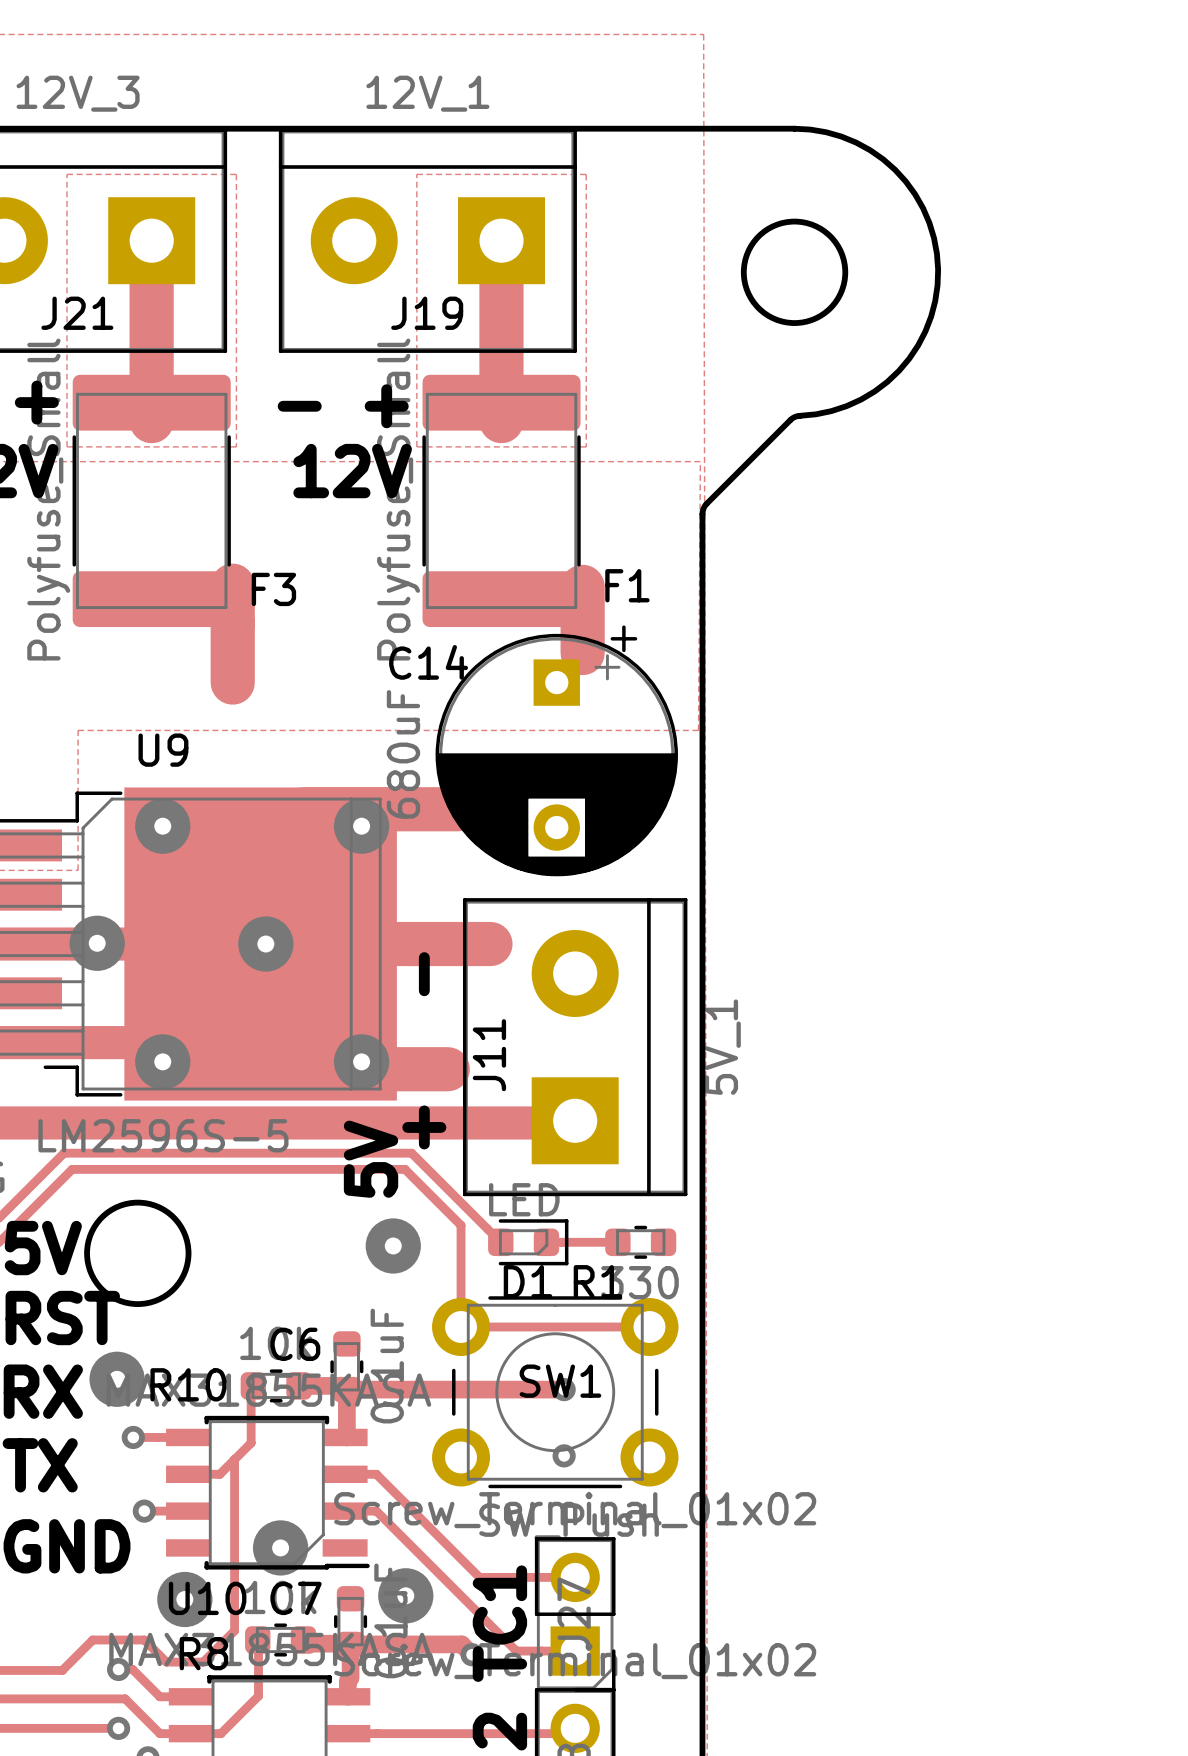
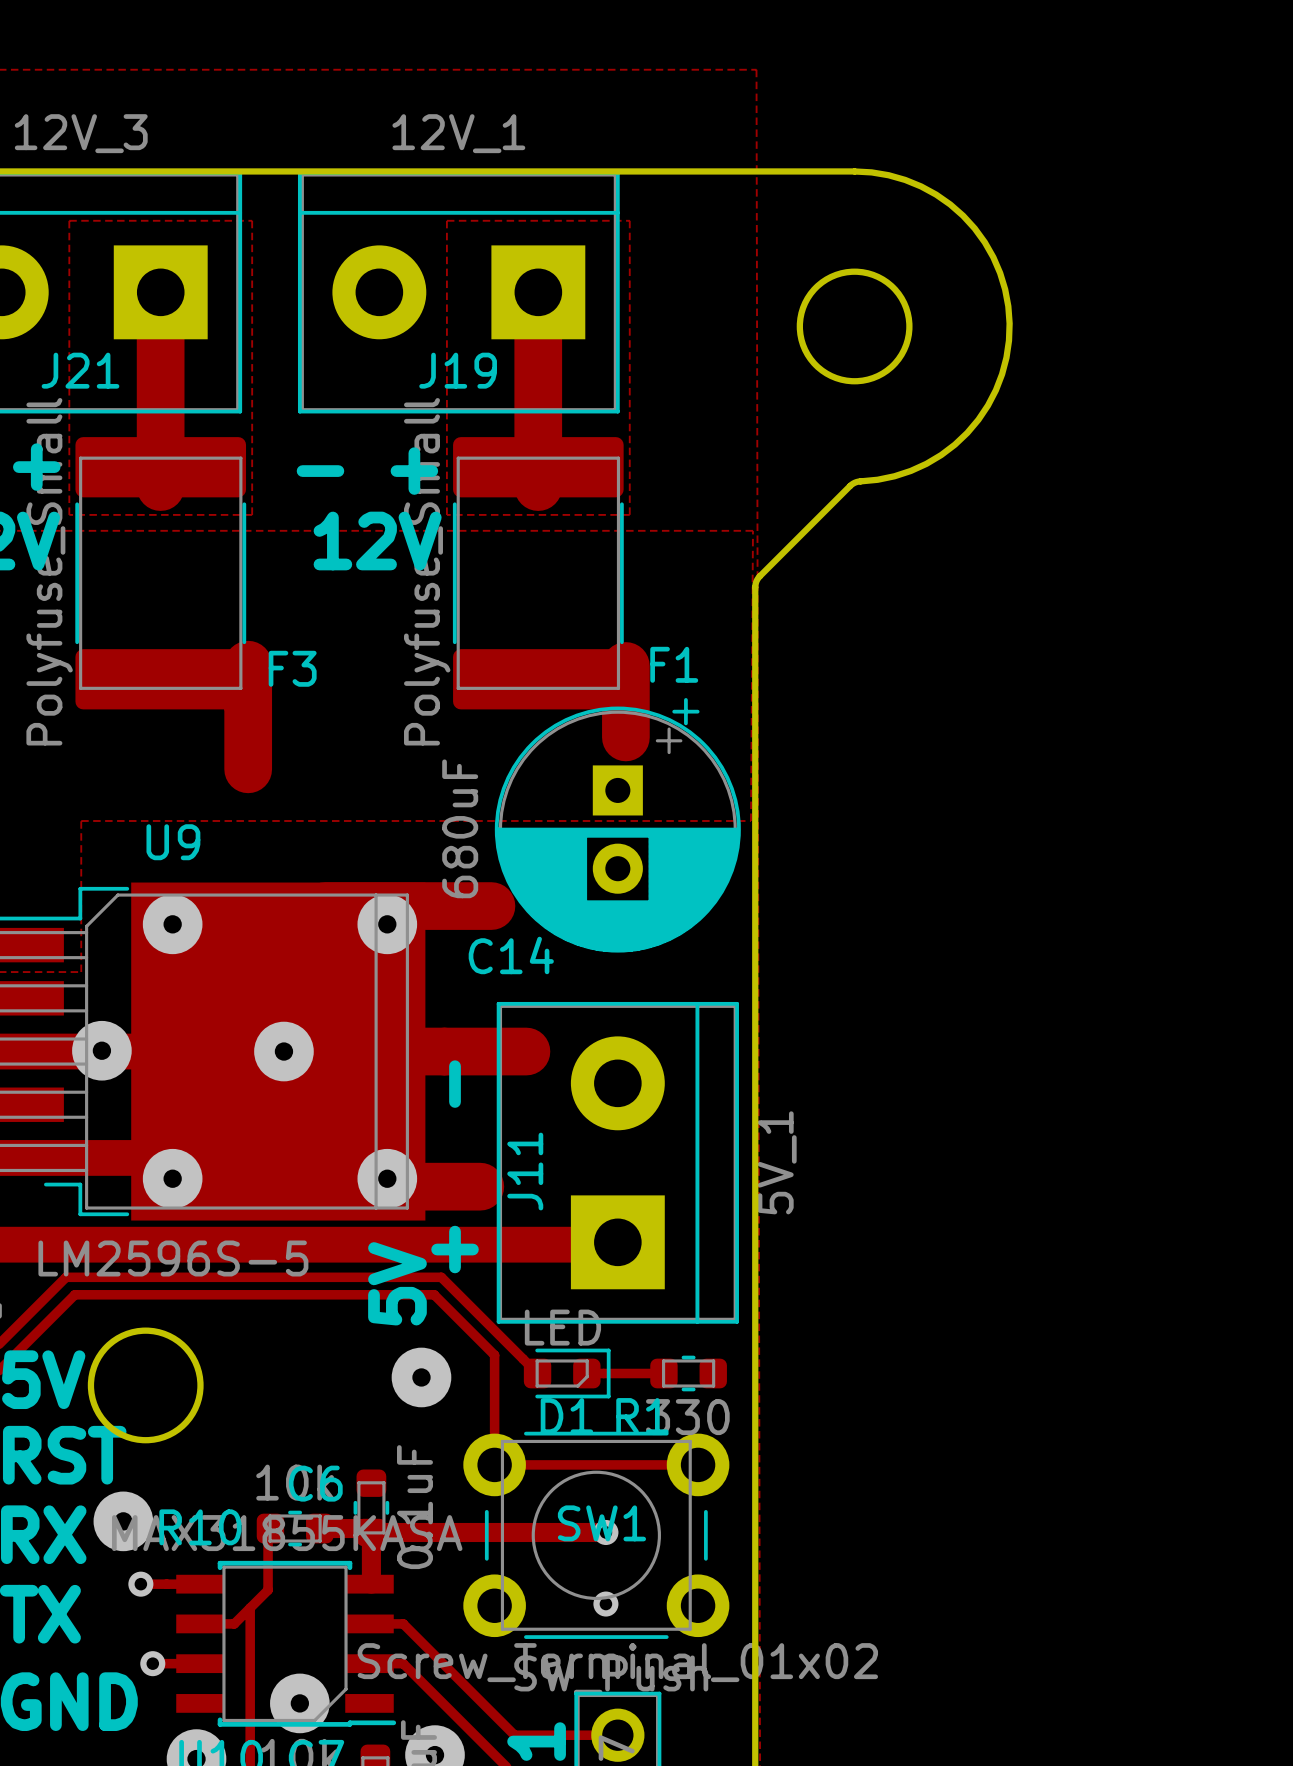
C14 footprint: [435, 625, 678, 877] -> [494, 698, 741, 953]
C14 name position: C14 (428, 662) -> C14 (511, 955)

